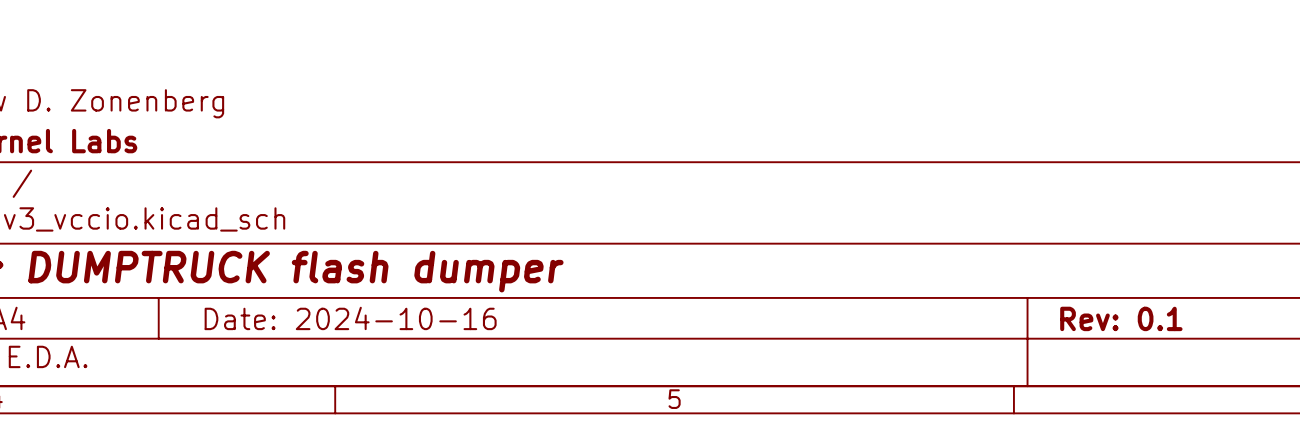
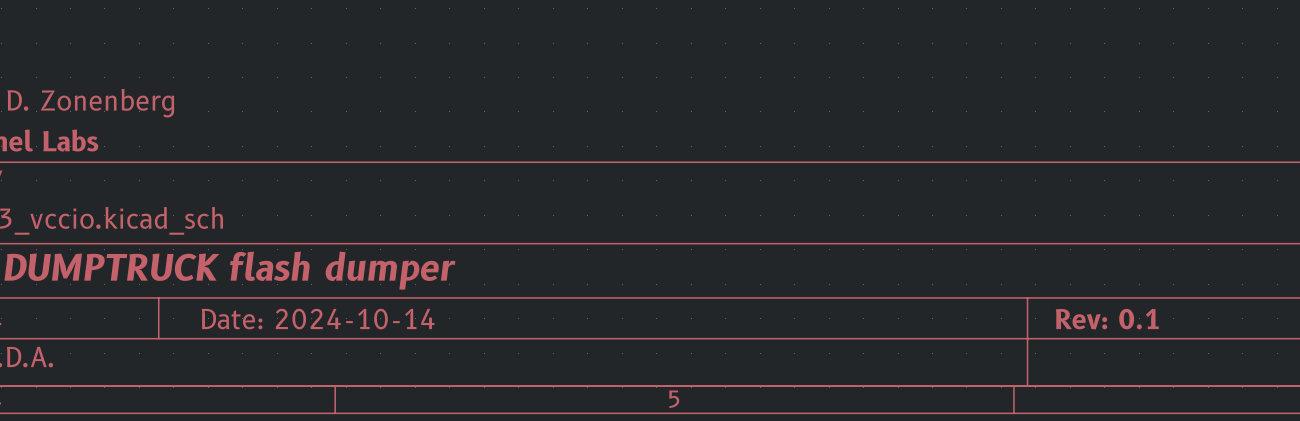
title block: Date: 2024-10-16 (350, 318) -> Date: 2024-10-14 (318, 319)

